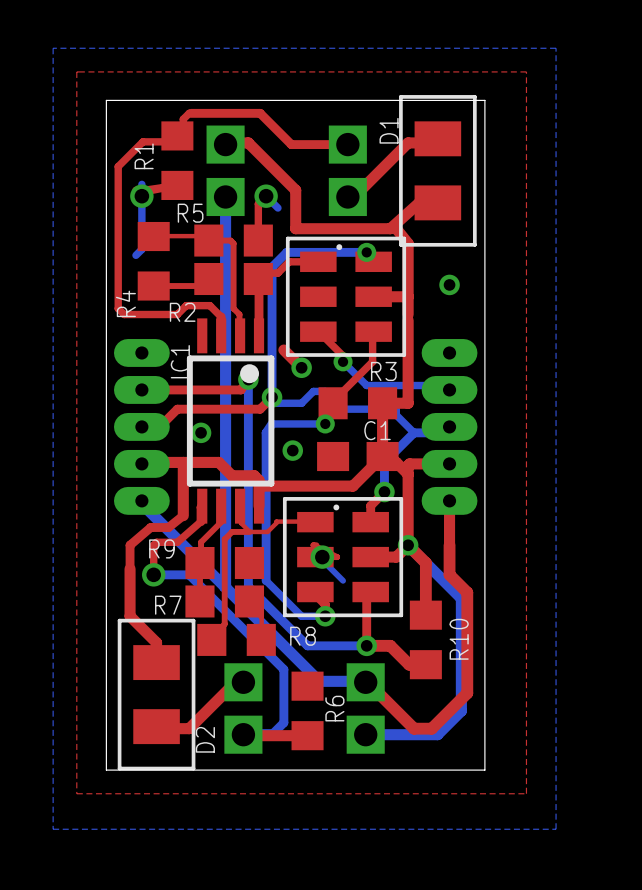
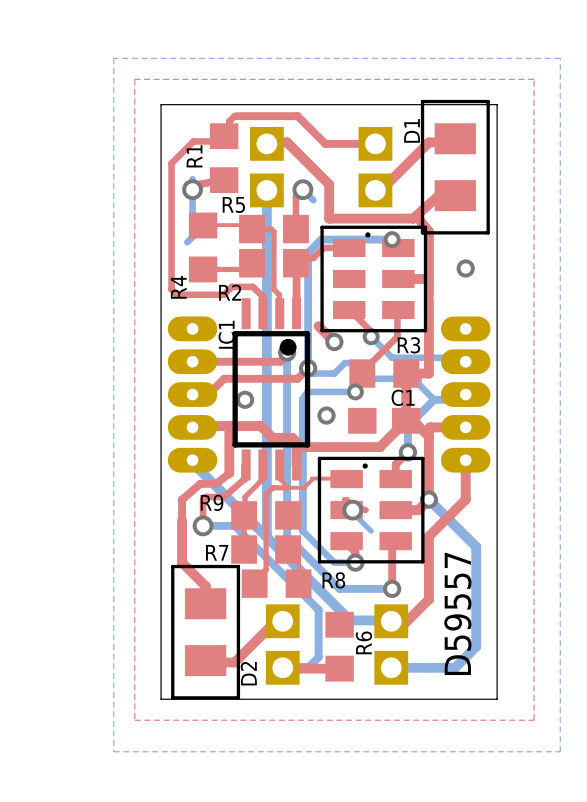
top track: (408, 545) (425, 563) (425, 615) -> none
top track: (449, 545) (449, 574) (467, 592) (467, 693) (431, 728) (414, 728) (366, 681) -> (465, 499) (428, 536) (428, 599) (402, 625)
R10: (425, 639) -> none
top track: (366, 645) (390, 645) (409, 664) (425, 664) -> none
text: none -> D59557 (457, 613)

